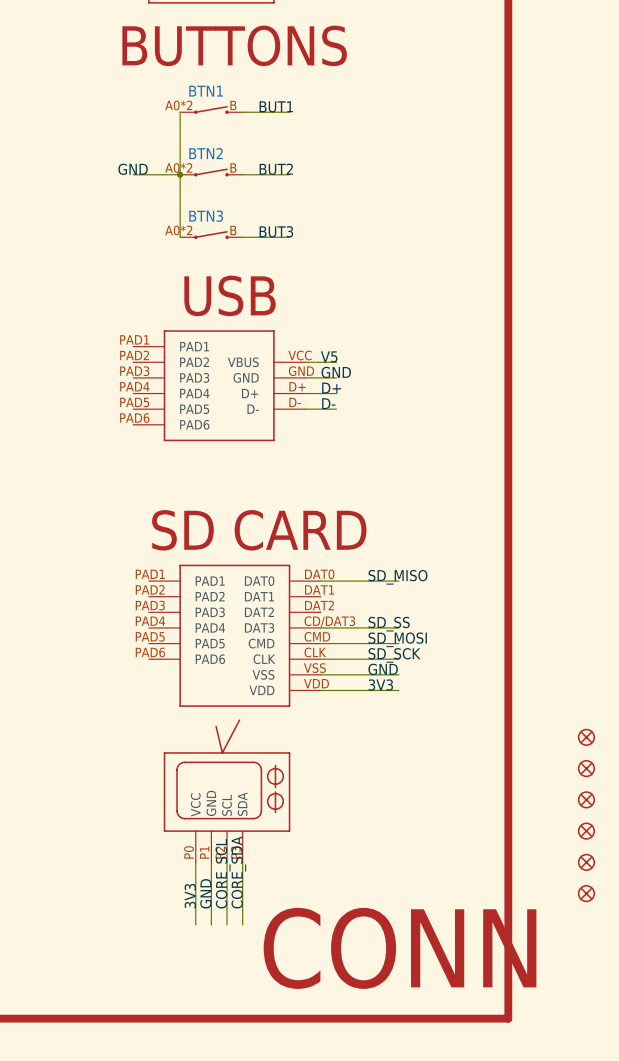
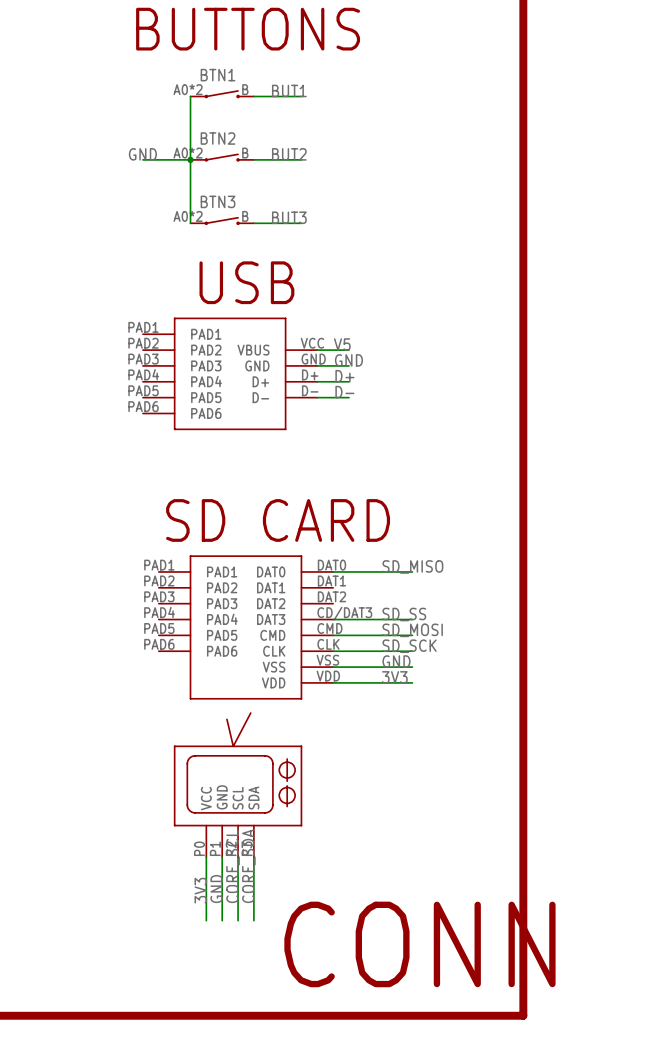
part: (586, 737) -> none
part: (586, 768) -> none
part: (586, 799) -> none
part: (586, 831) -> none
part: (586, 862) -> none
part: (586, 893) -> none

